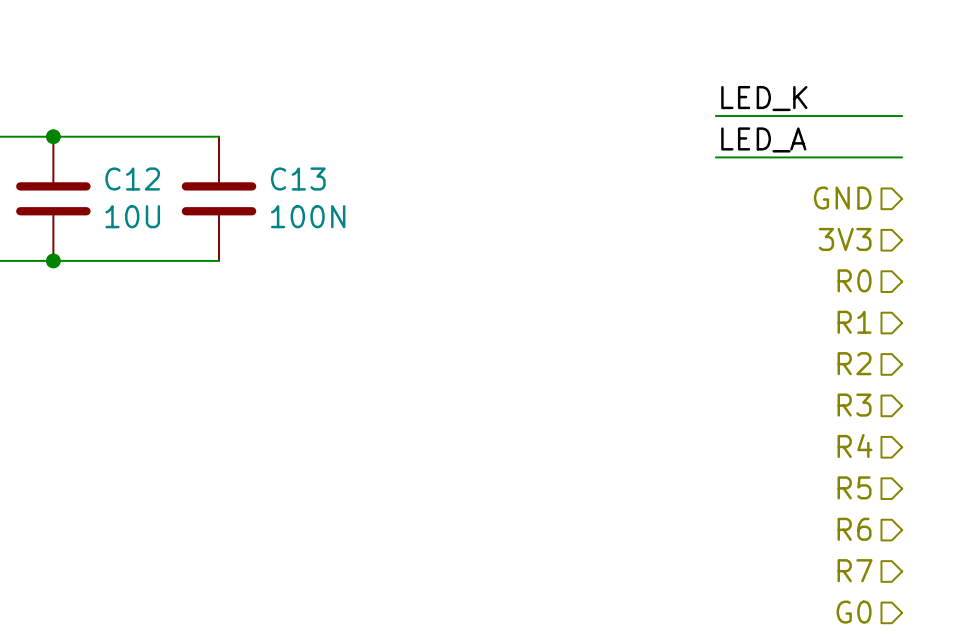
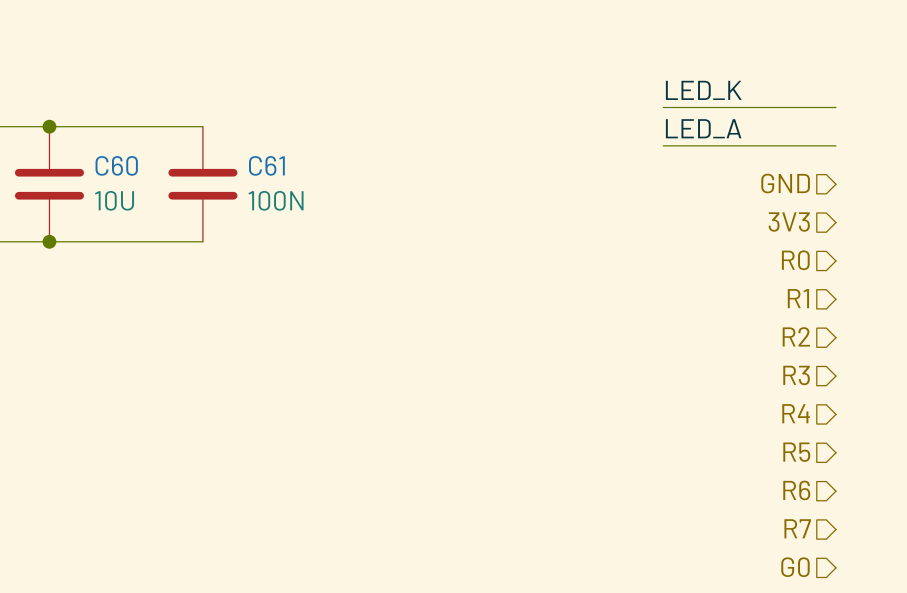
C12 name: C12 (132, 179) -> C60 (116, 165)
C13 name: C13 (298, 179) -> C61 (266, 165)

